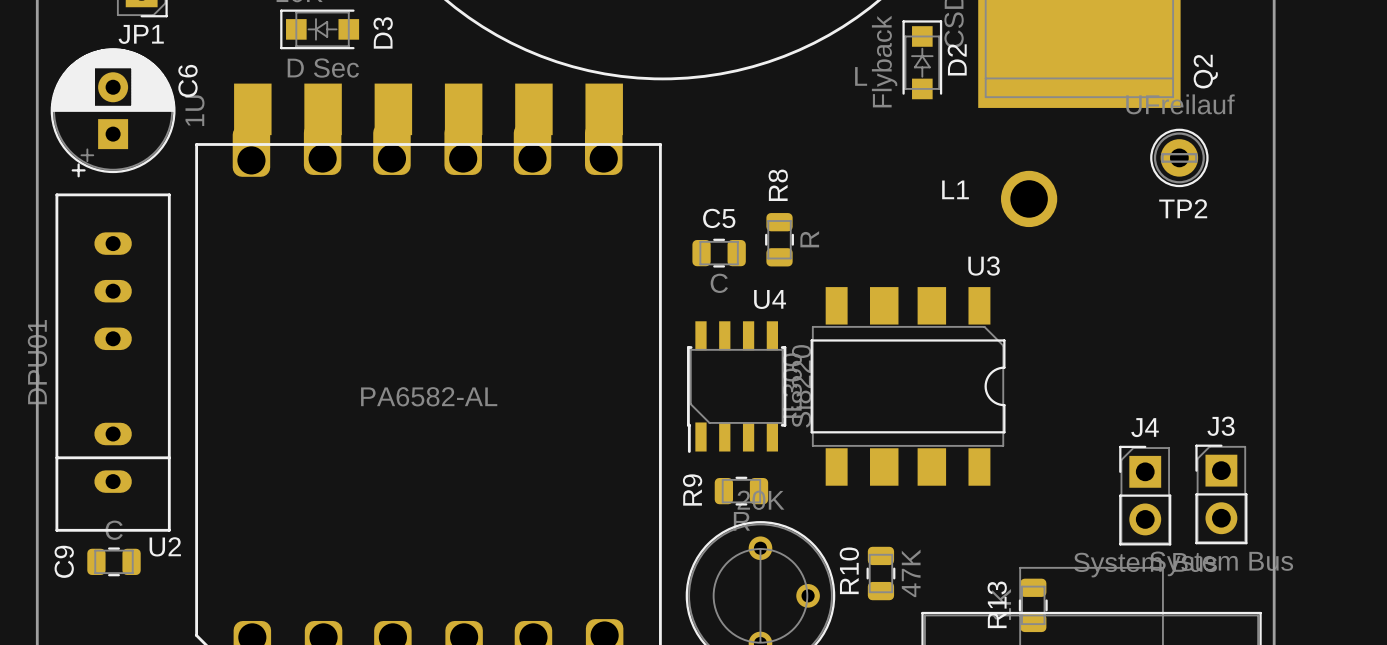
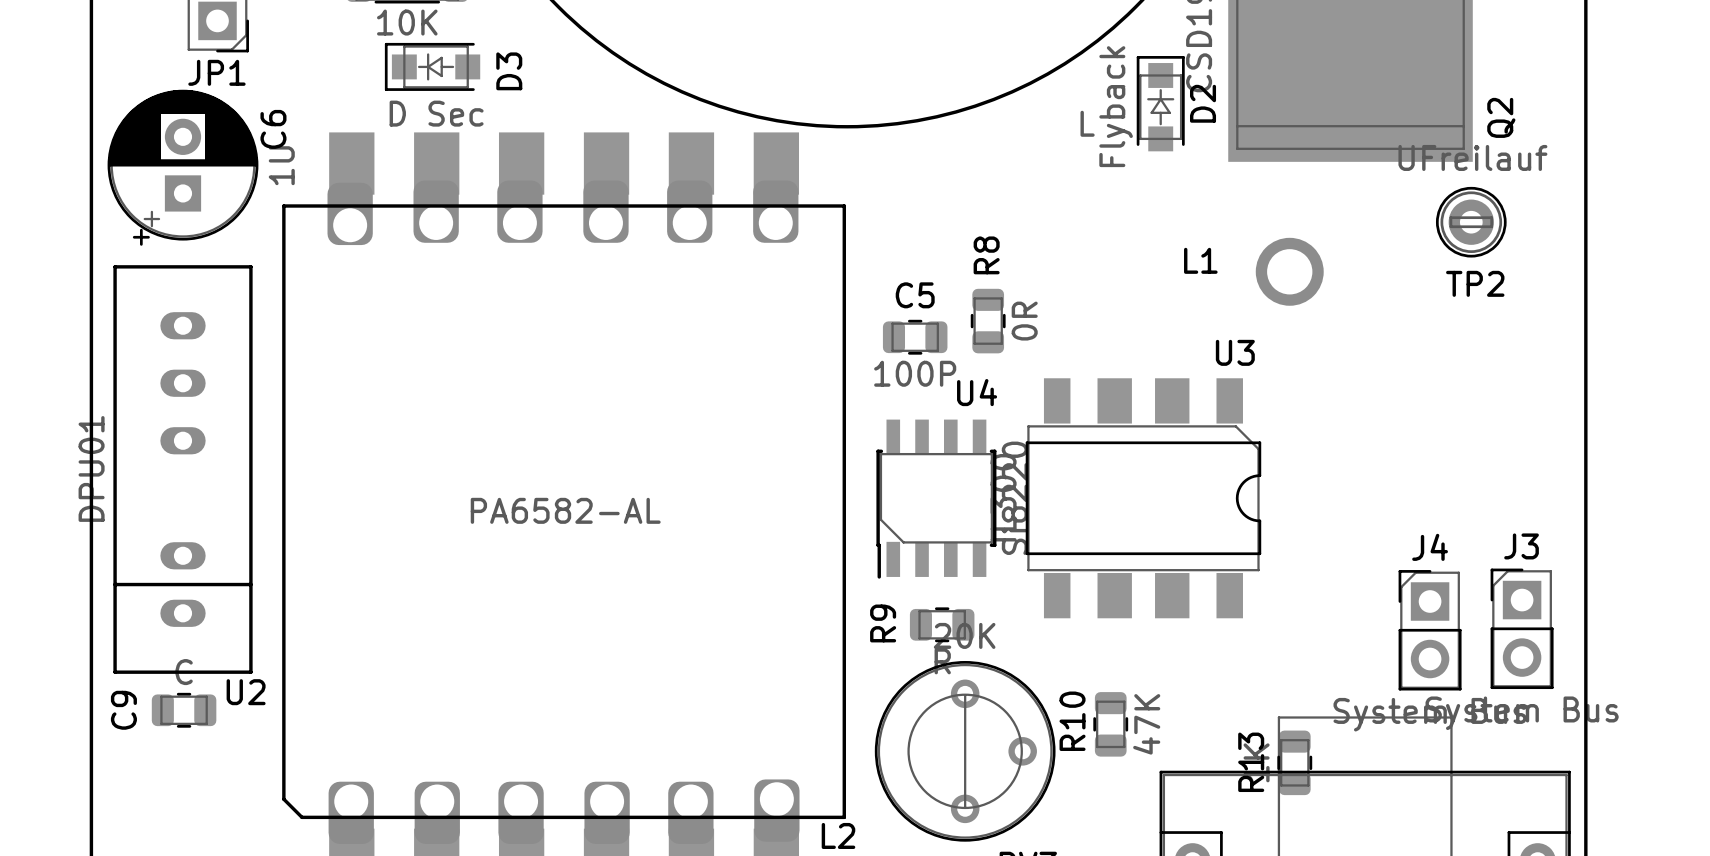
R8 value: R (809, 239) -> 0R (1024, 321)
C5 value: C (719, 283) -> 100P (915, 373)

